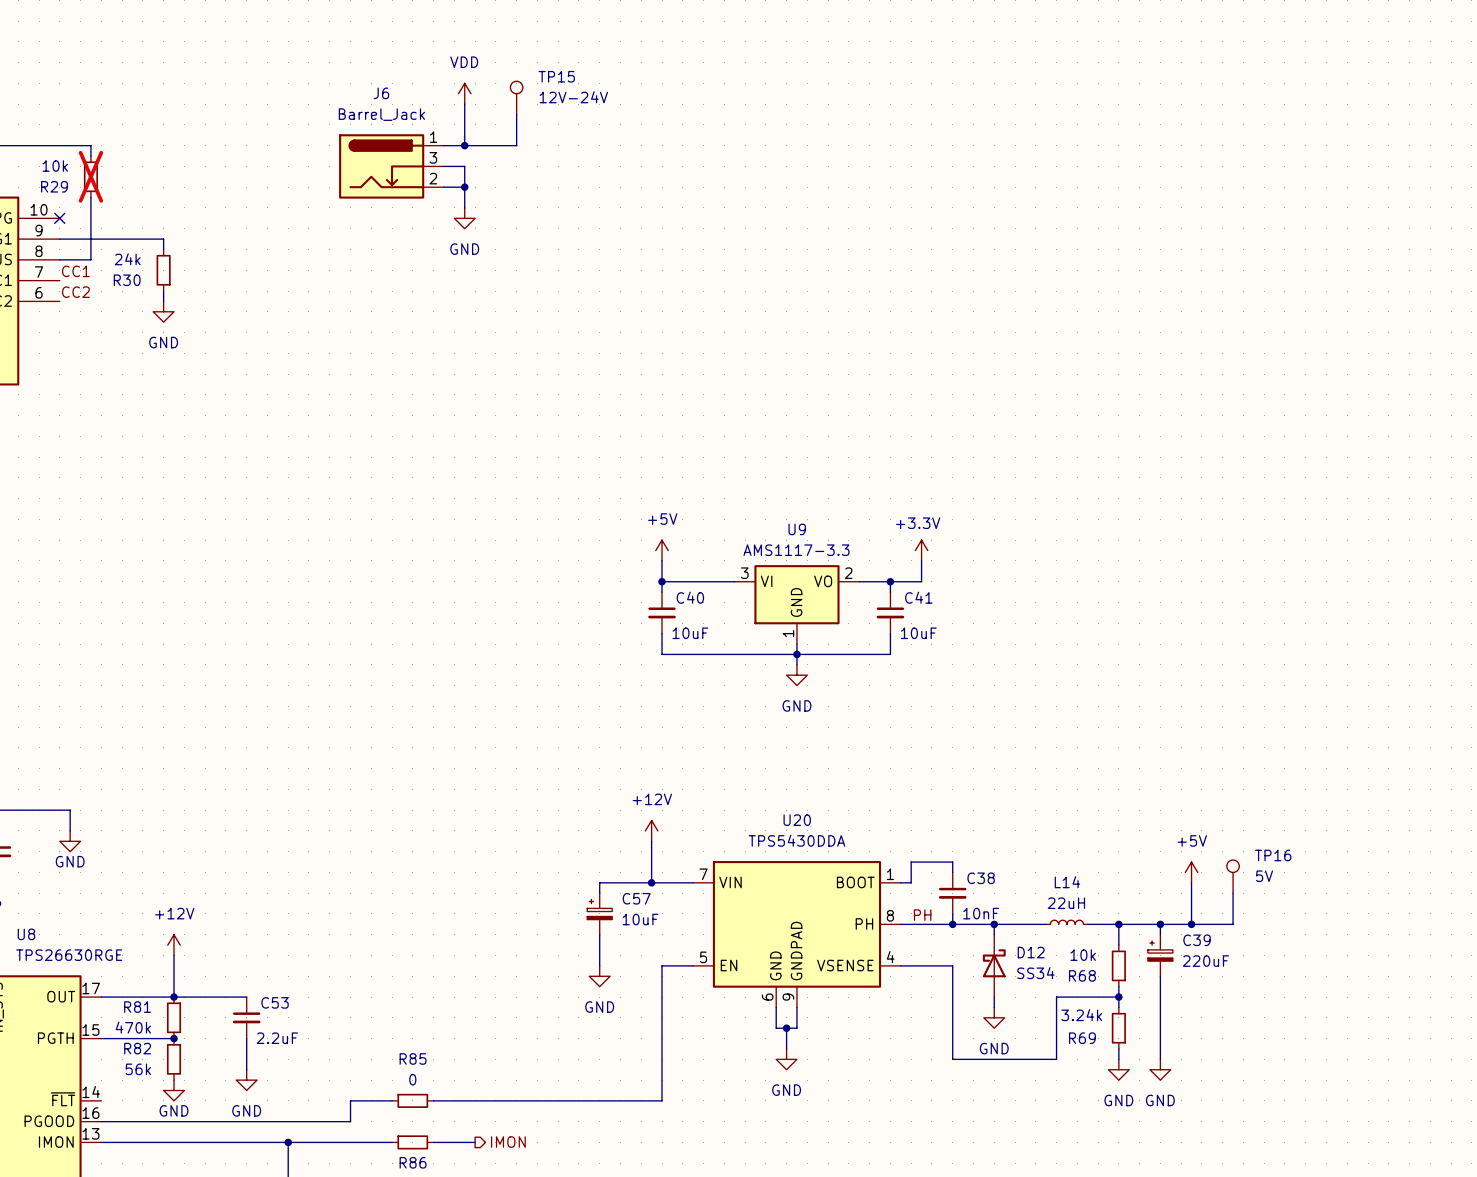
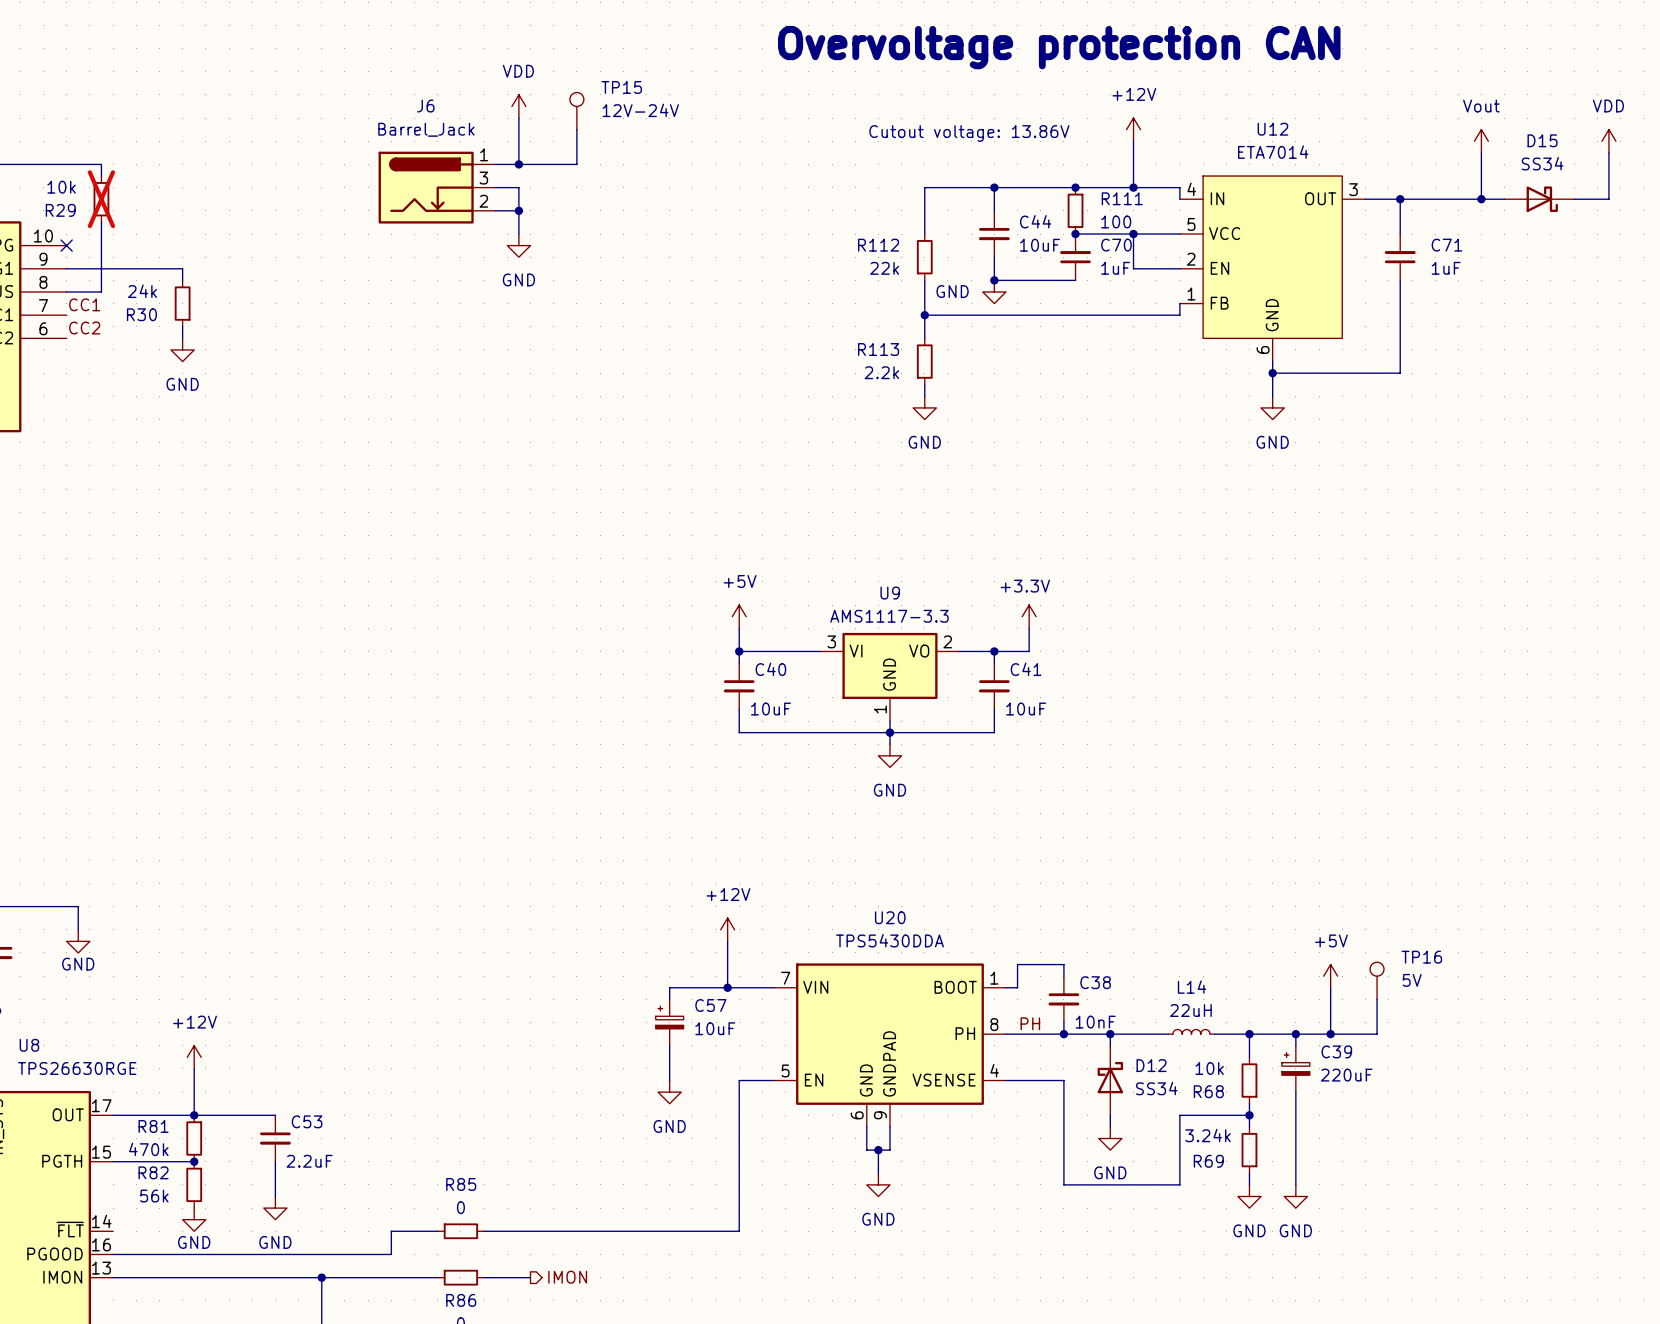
text: none -> Overvoltage protection CAN (1059, 47)
power symbol: none -> +12V (1133, 129)
text: none -> Cutout voltage: 13.86V (969, 133)
wire: none -> (1133, 141) (1133, 187)
power symbol: none -> Vout (1481, 141)
power symbol: none -> VDD (1608, 141)
wire: none -> (1481, 152) (1481, 199)
wire: none -> (1608, 152) (1608, 199) (1574, 199)
wire: none -> (994, 187) (994, 210)
junction: none -> (994, 187)
junction: none -> (1075, 187)
junction: none -> (1133, 187)
wire: none -> (1179, 199) (1179, 187) (924, 187) (924, 234)
wire: none -> (1365, 199) (1504, 199)
wire: none -> (1400, 199) (1400, 234)
junction: none -> (1400, 199)
junction: none -> (1481, 199)
D15: none -> SS34 (1539, 199)
R111: none -> 100 (1075, 210)
C44: none -> 10uF (994, 234)
wire: none -> (1075, 234) (1179, 234)
junction: none -> (1075, 234)
wire: none -> (1133, 234) (1133, 268) (1179, 268)
junction: none -> (1133, 234)
R112: none -> 22k (924, 257)
wire: none -> (994, 257) (994, 280) (1075, 280)
C70: none -> 1uF (1075, 257)
C71: none -> 1uF (1400, 257)
U12: none -> ETA7014 (1272, 268)
wire: none -> (924, 280) (924, 338)
junction: none -> (994, 280)
wire: none -> (1400, 280) (1400, 373) (1272, 373)
power symbol: none -> GND (994, 291)
wire: none -> (1179, 303) (1179, 315) (924, 315)
junction: none -> (924, 315)
R113: none -> 2.2k (924, 361)
wire: none -> (1272, 361) (1272, 396)
junction: none -> (1272, 373)
wire: none -> (924, 384) (924, 396)
power symbol: none -> GND (924, 407)
power symbol: none -> GND (1272, 407)

